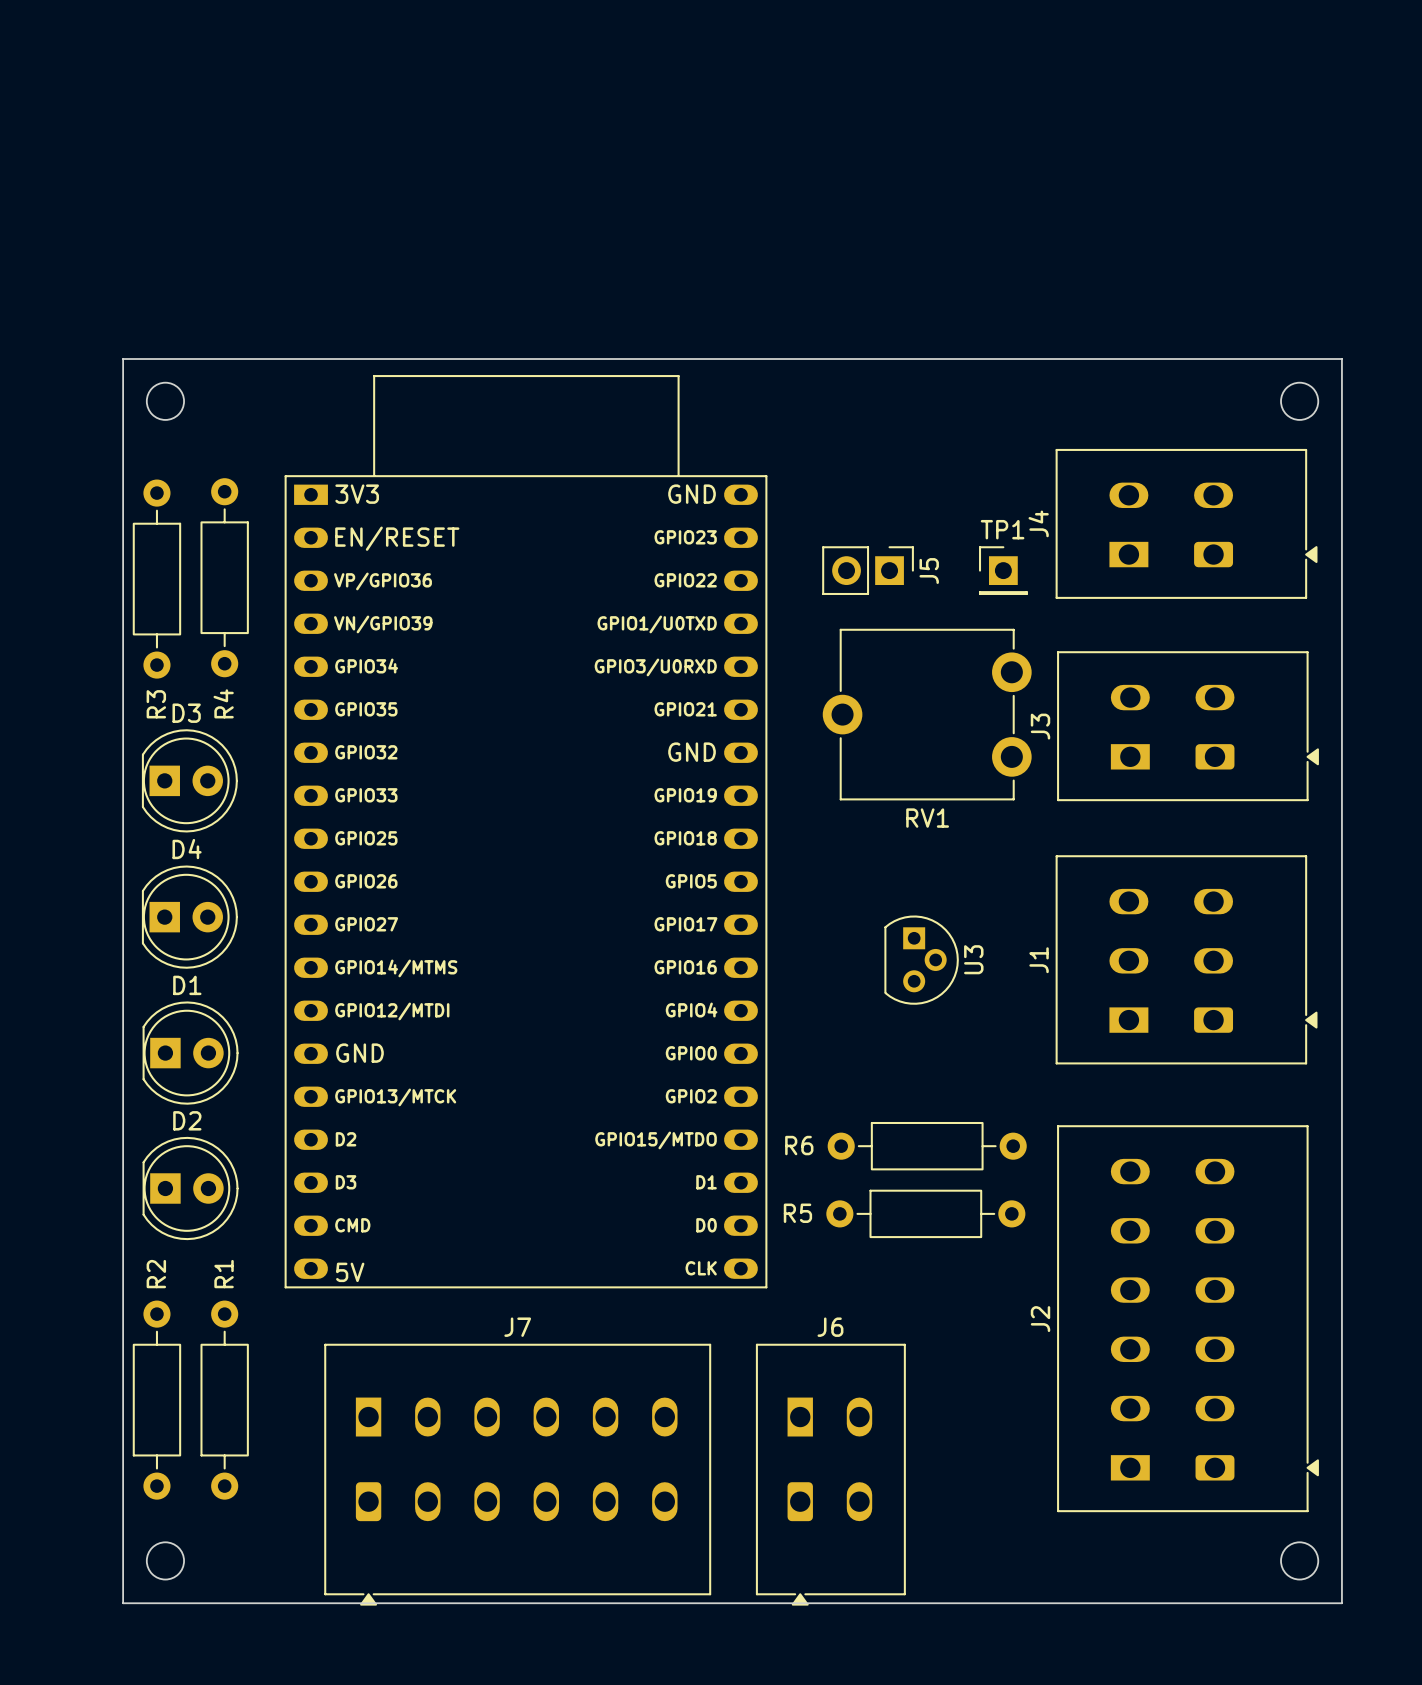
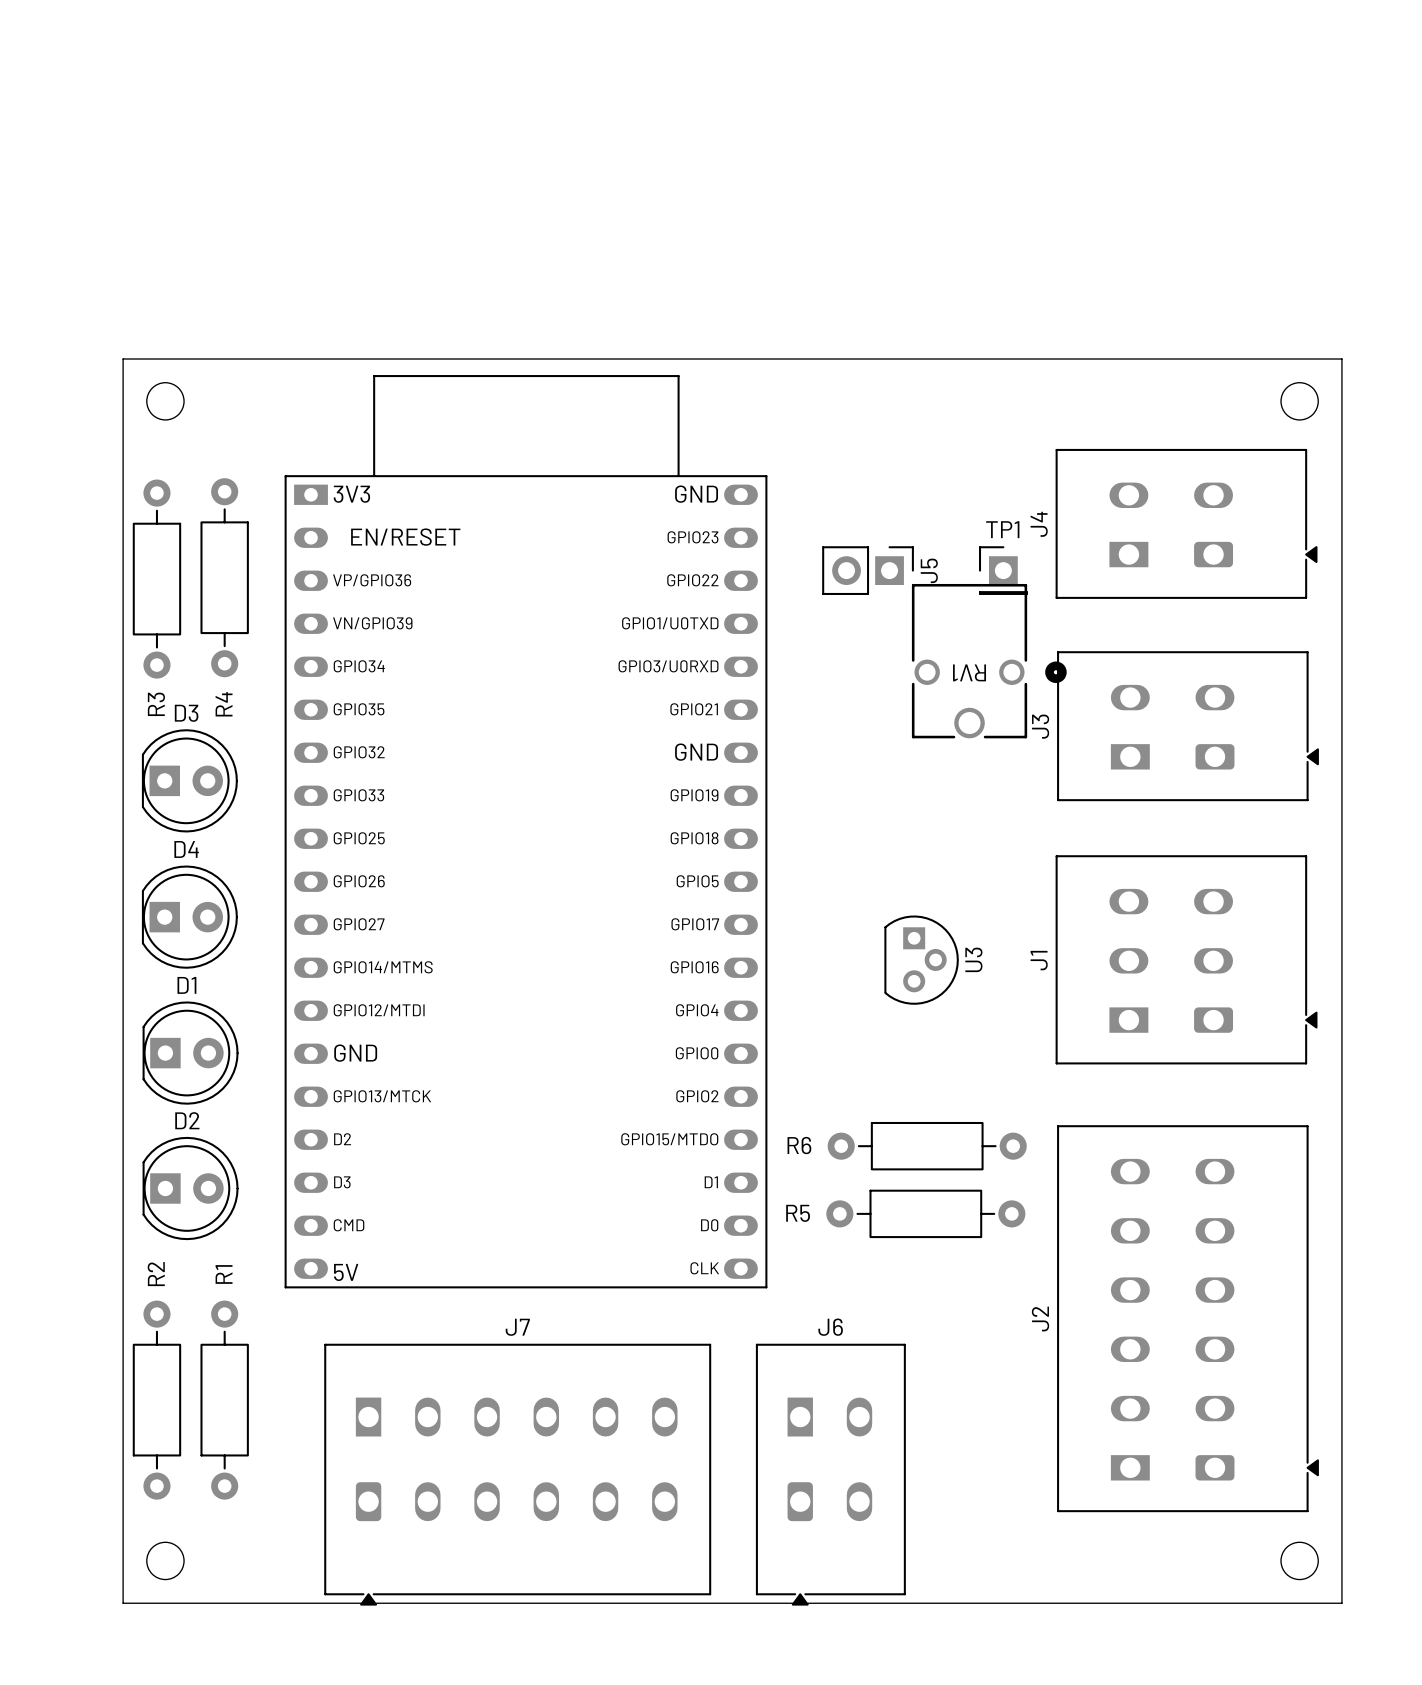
RV1 footprint: [822, 628, 1032, 801] -> [911, 583, 1067, 739]
RV1 name position: RV1 (927, 818) -> RV1 (969, 672)

